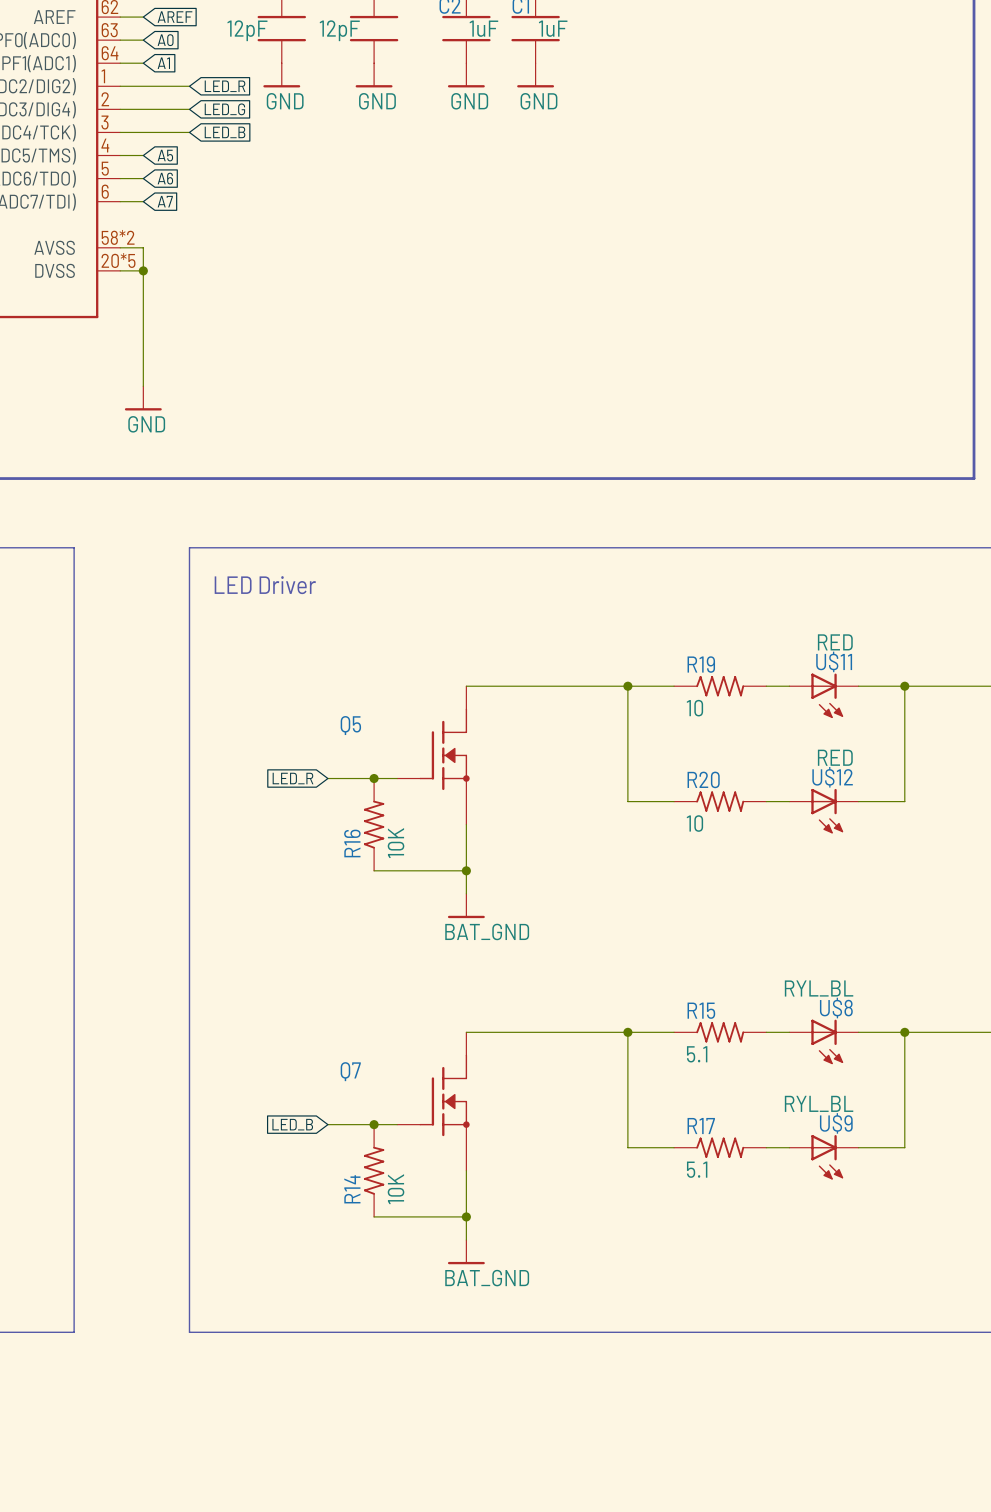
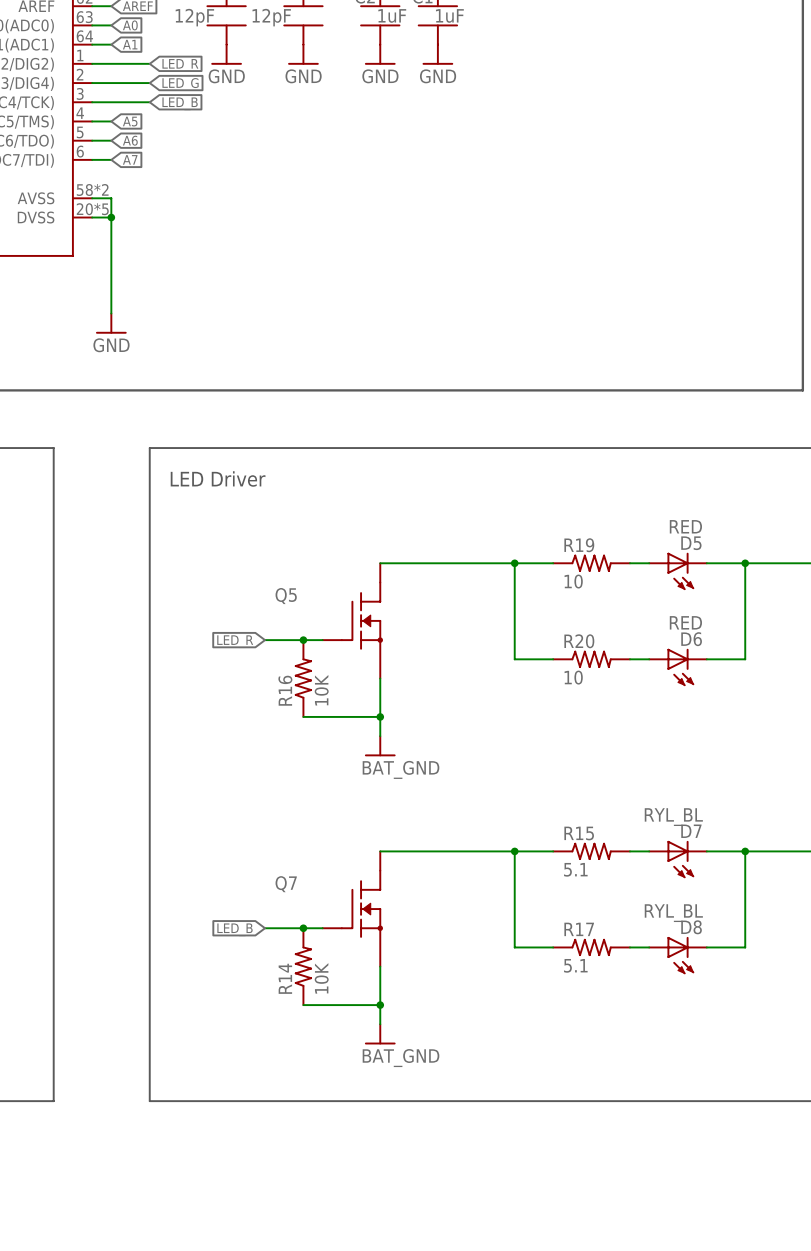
U$11 name: U$11 (834, 661) -> D5 (691, 543)
U$12 name: U$12 (832, 777) -> D6 (691, 639)
U$8 name: U$8 (836, 1008) -> D7 (691, 831)
U$9 name: U$9 (836, 1123) -> D8 (691, 927)

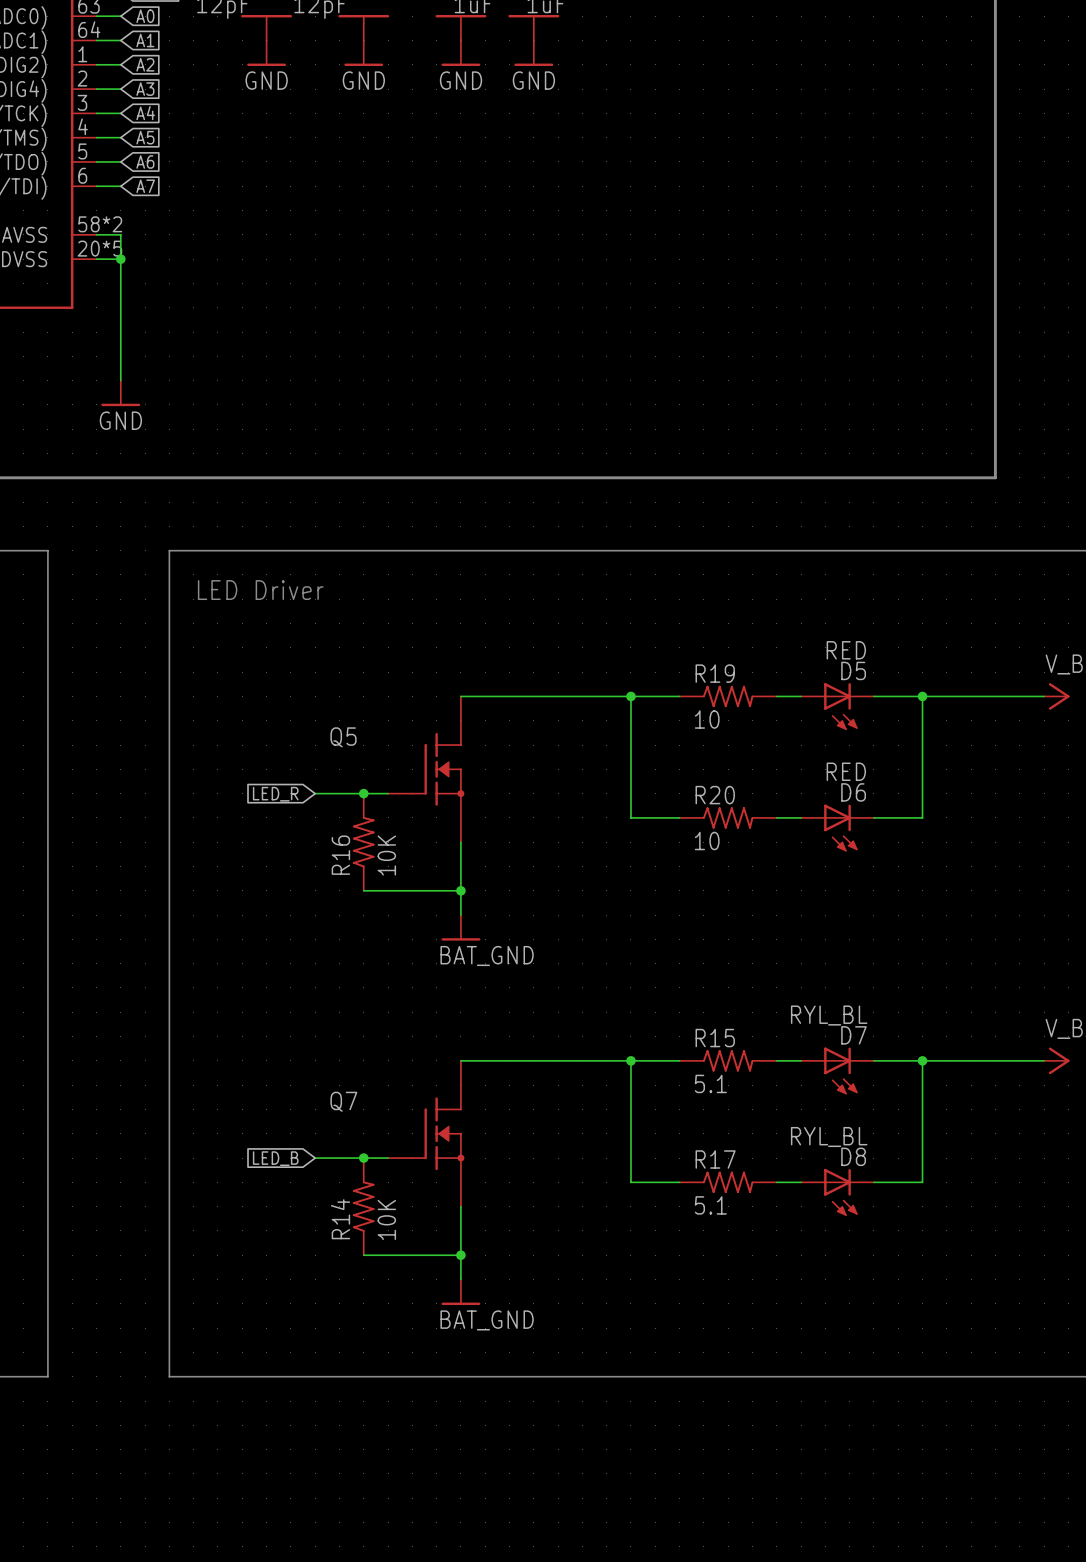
wire: (111, 63) (149, 63) -> none
global label: none -> A2 (145, 64)
global label: LED_R (180, 65) -> none
wire: (111, 83) (149, 83) -> none
global label: none -> A3 (145, 89)
global label: LED_G (180, 84) -> none
wire: (111, 102) (149, 102) -> none
global label: none -> A4 (145, 113)
global label: LED_B (180, 103) -> none

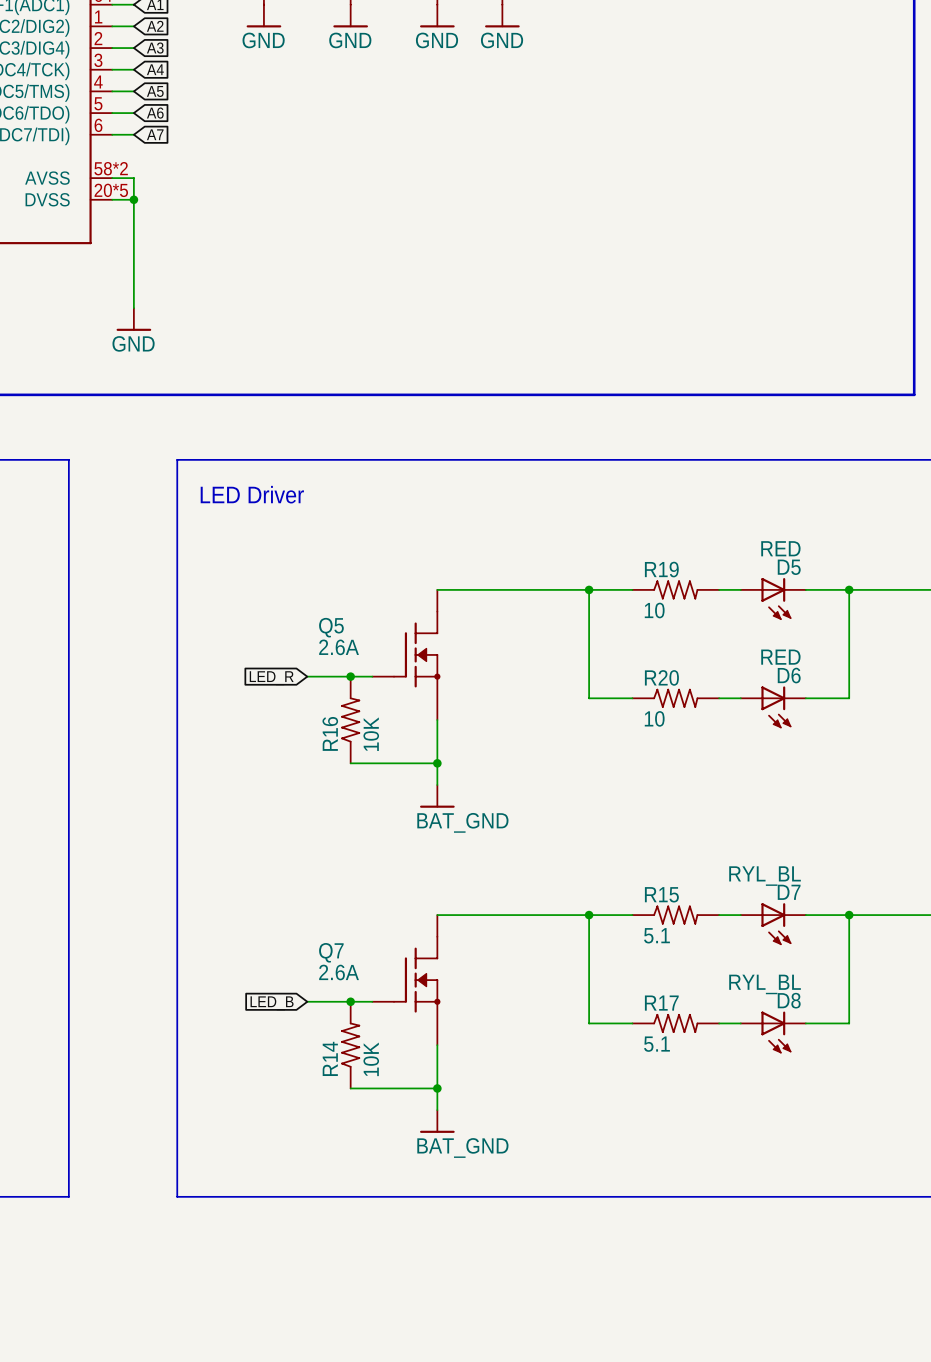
Q5 value: none -> 2.6A (339, 647)
Q7 value: none -> 2.6A (339, 972)

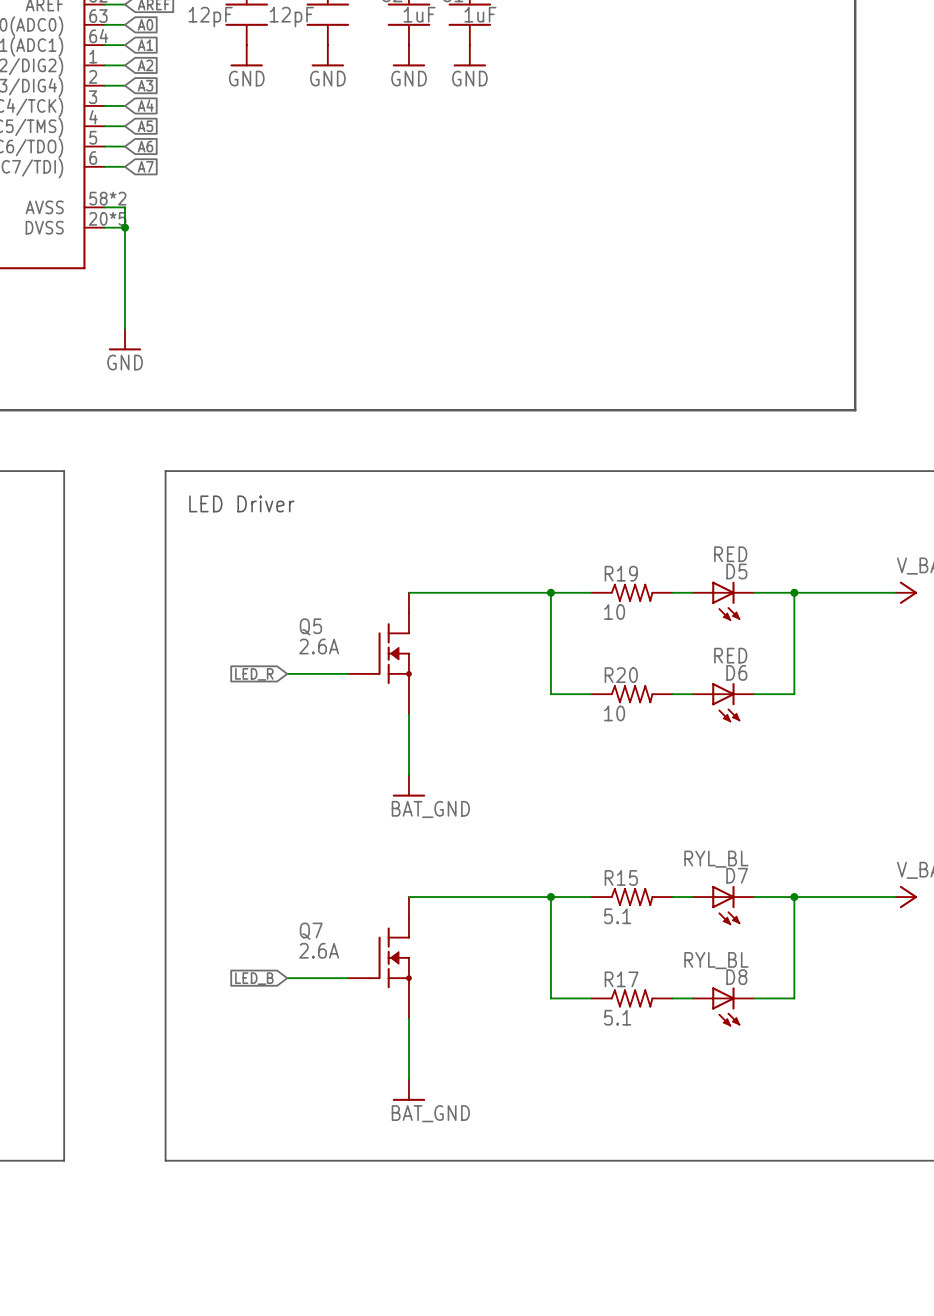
junction: (350, 676) -> none
R16: 10K (350, 719) -> none
wire: (350, 763) (437, 763) -> none
junction: (437, 763) -> none
junction: (350, 1001) -> none
R14: 10K (350, 1045) -> none
wire: (350, 1088) (437, 1088) -> none
junction: (437, 1088) -> none

